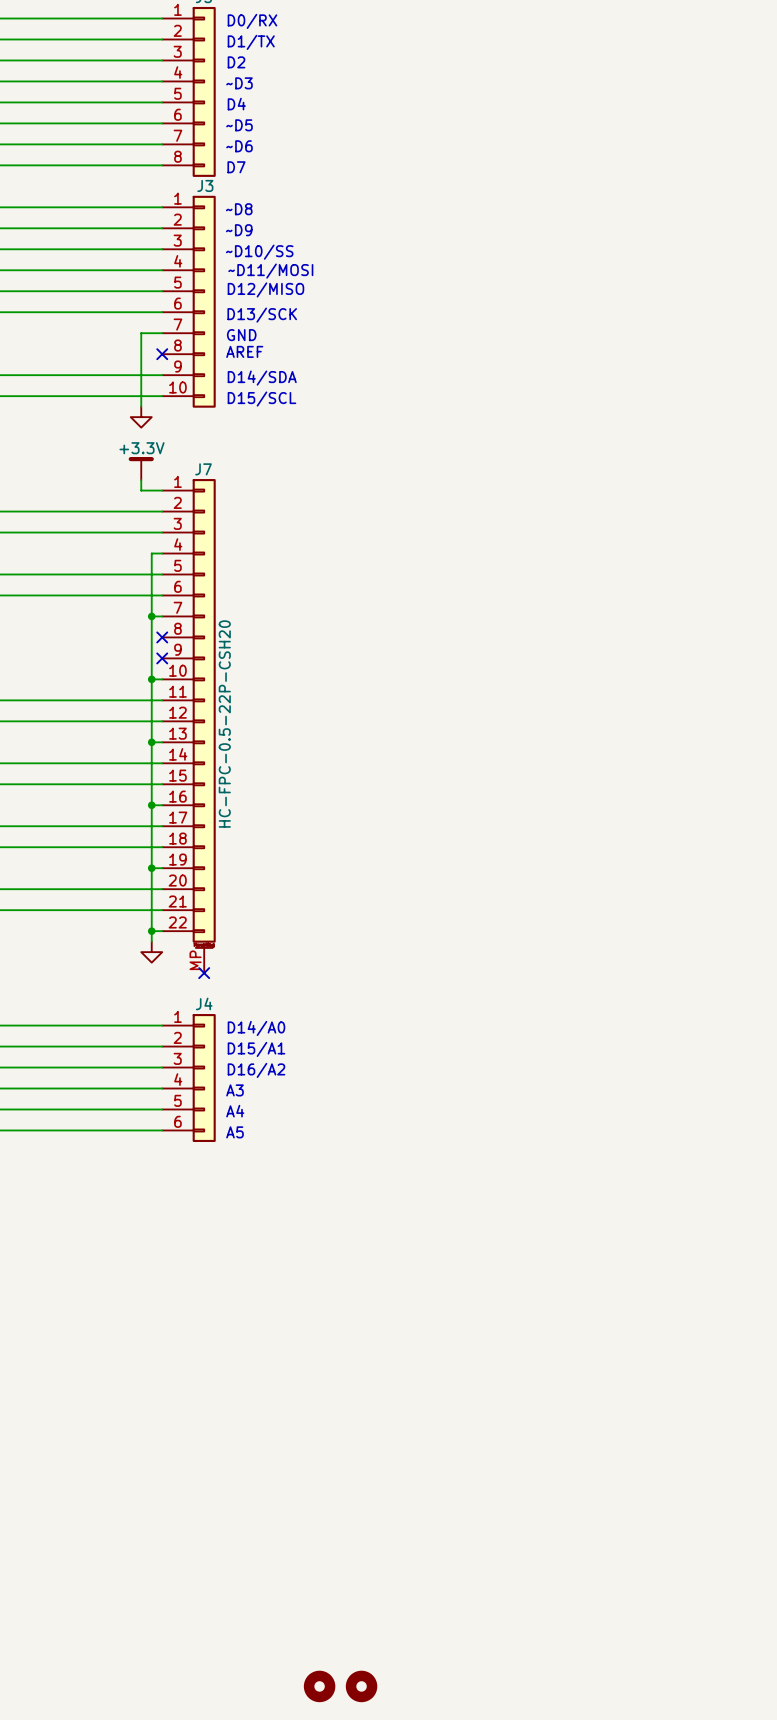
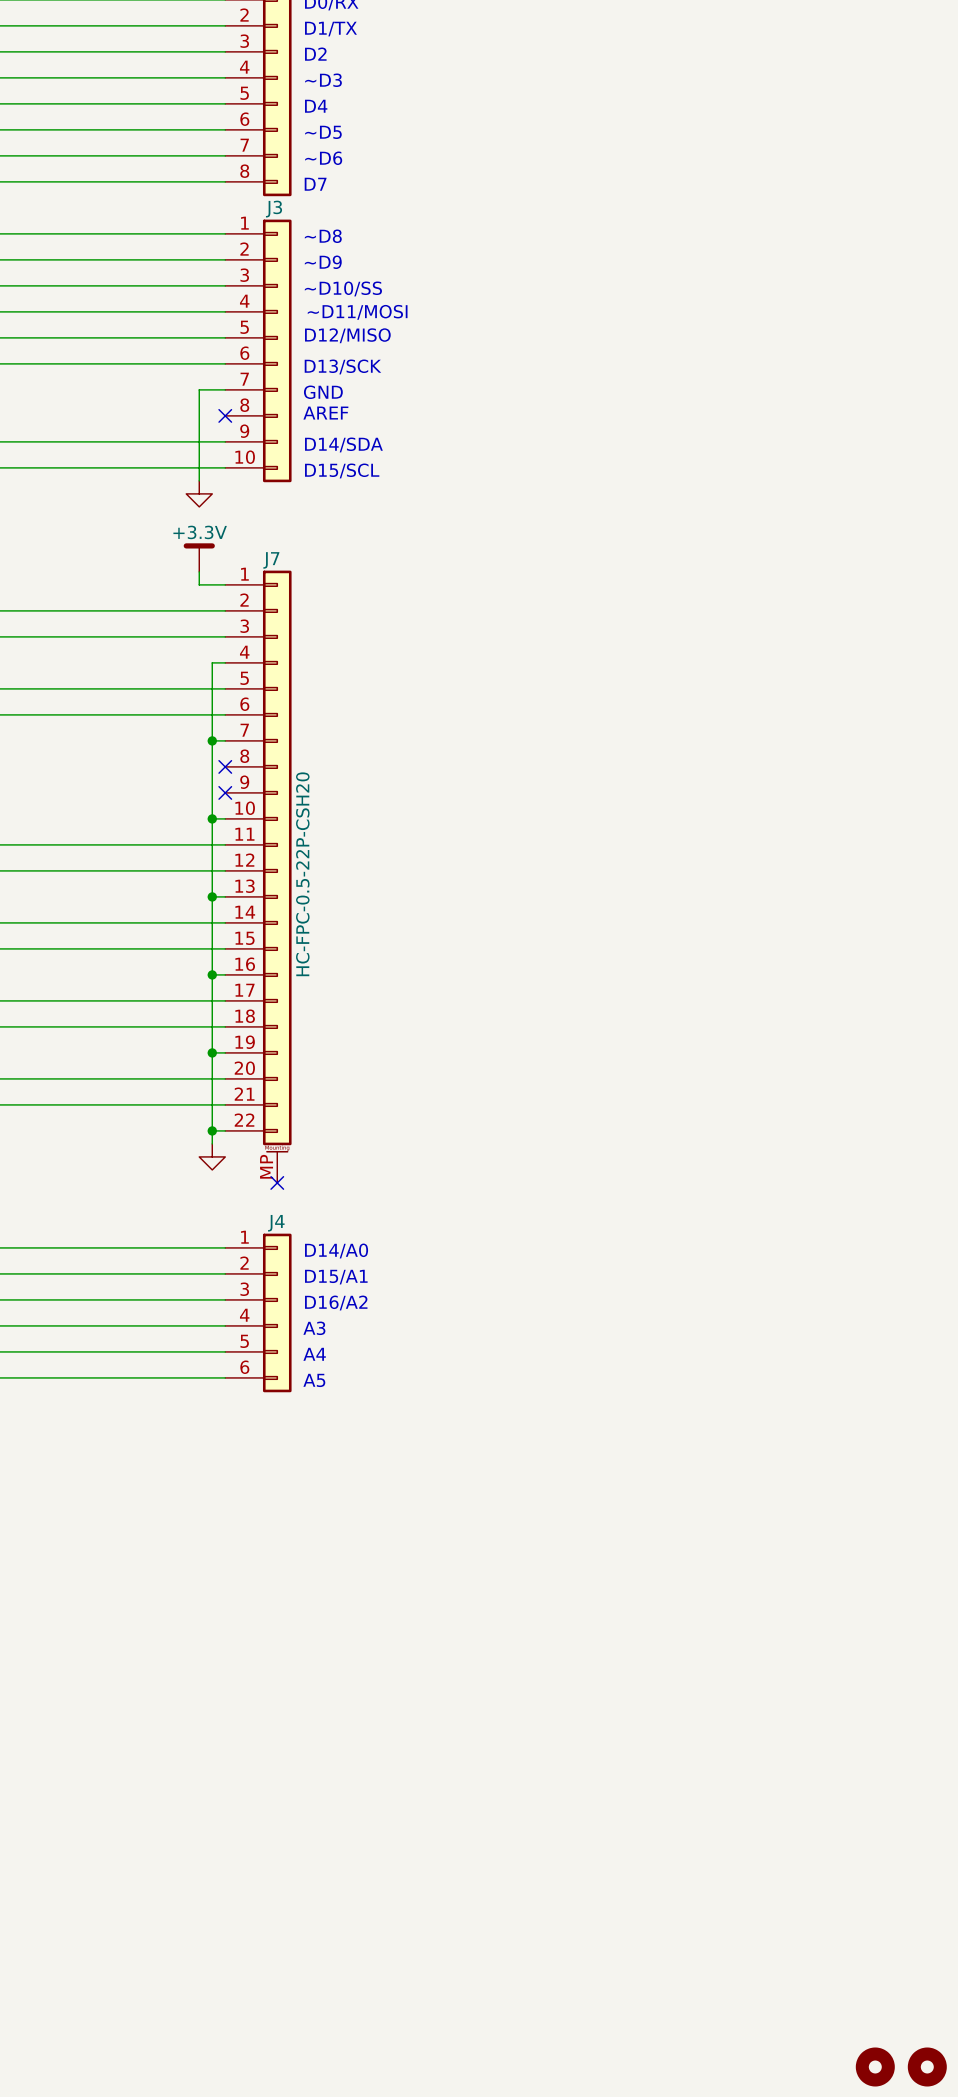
part: (319, 1686) -> none
part: (361, 1686) -> none
part: none -> (875, 2067)
part: none -> (927, 2067)

